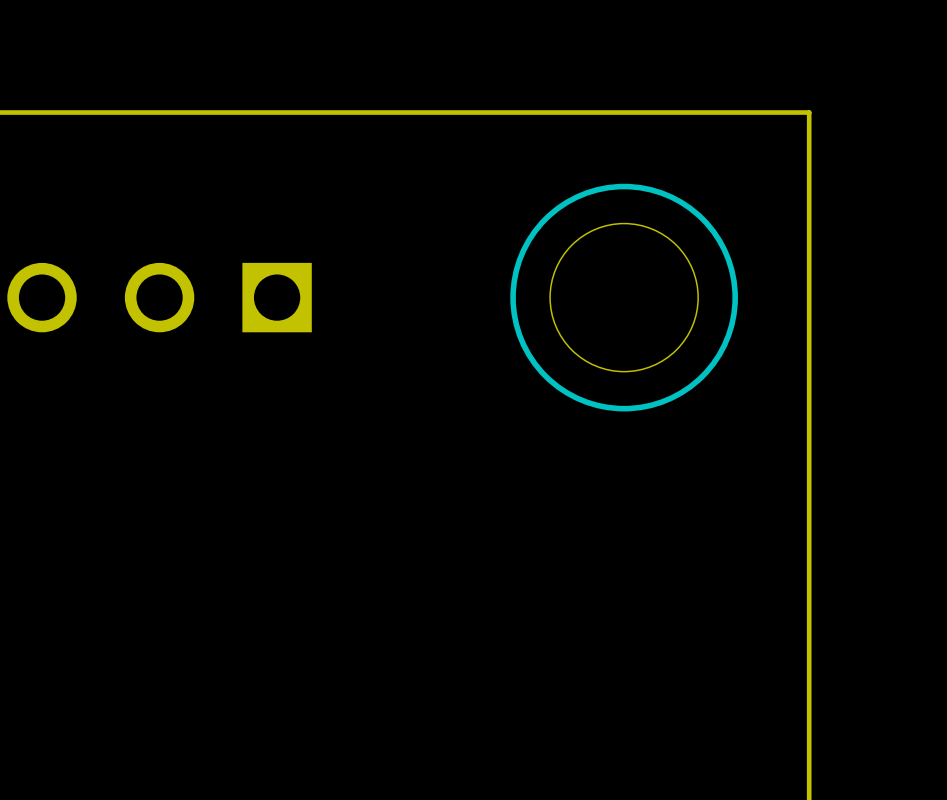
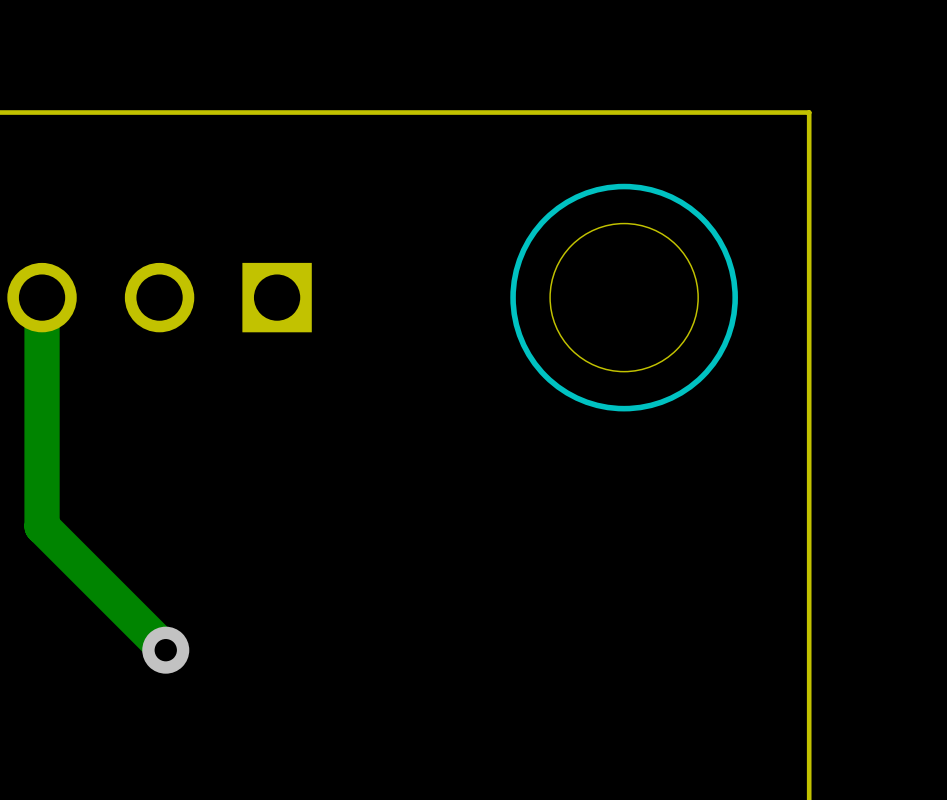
track: none -> (42, 297) (42, 526) (165, 650)
via: none -> (165, 650)

